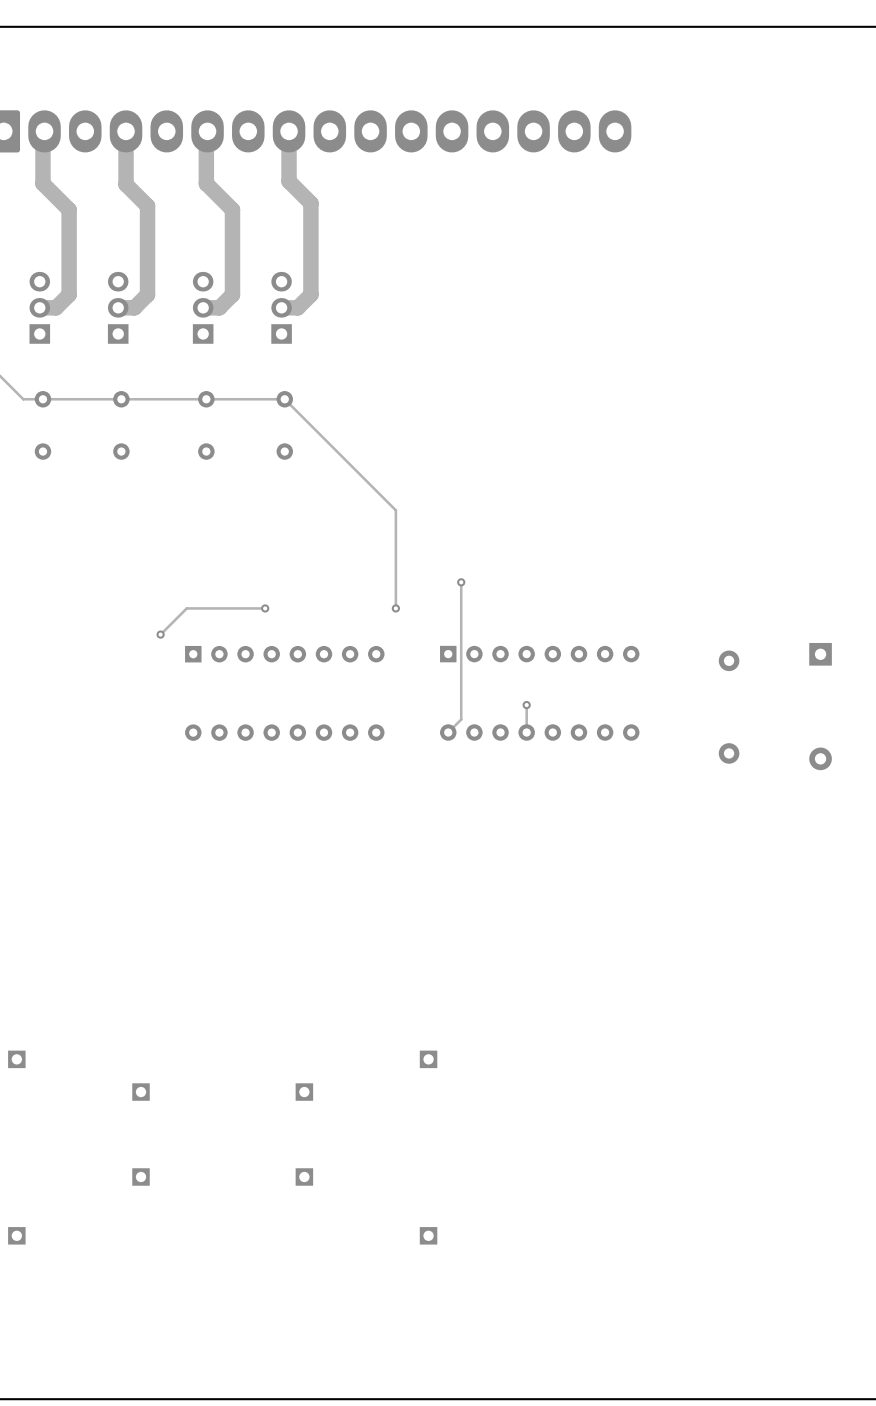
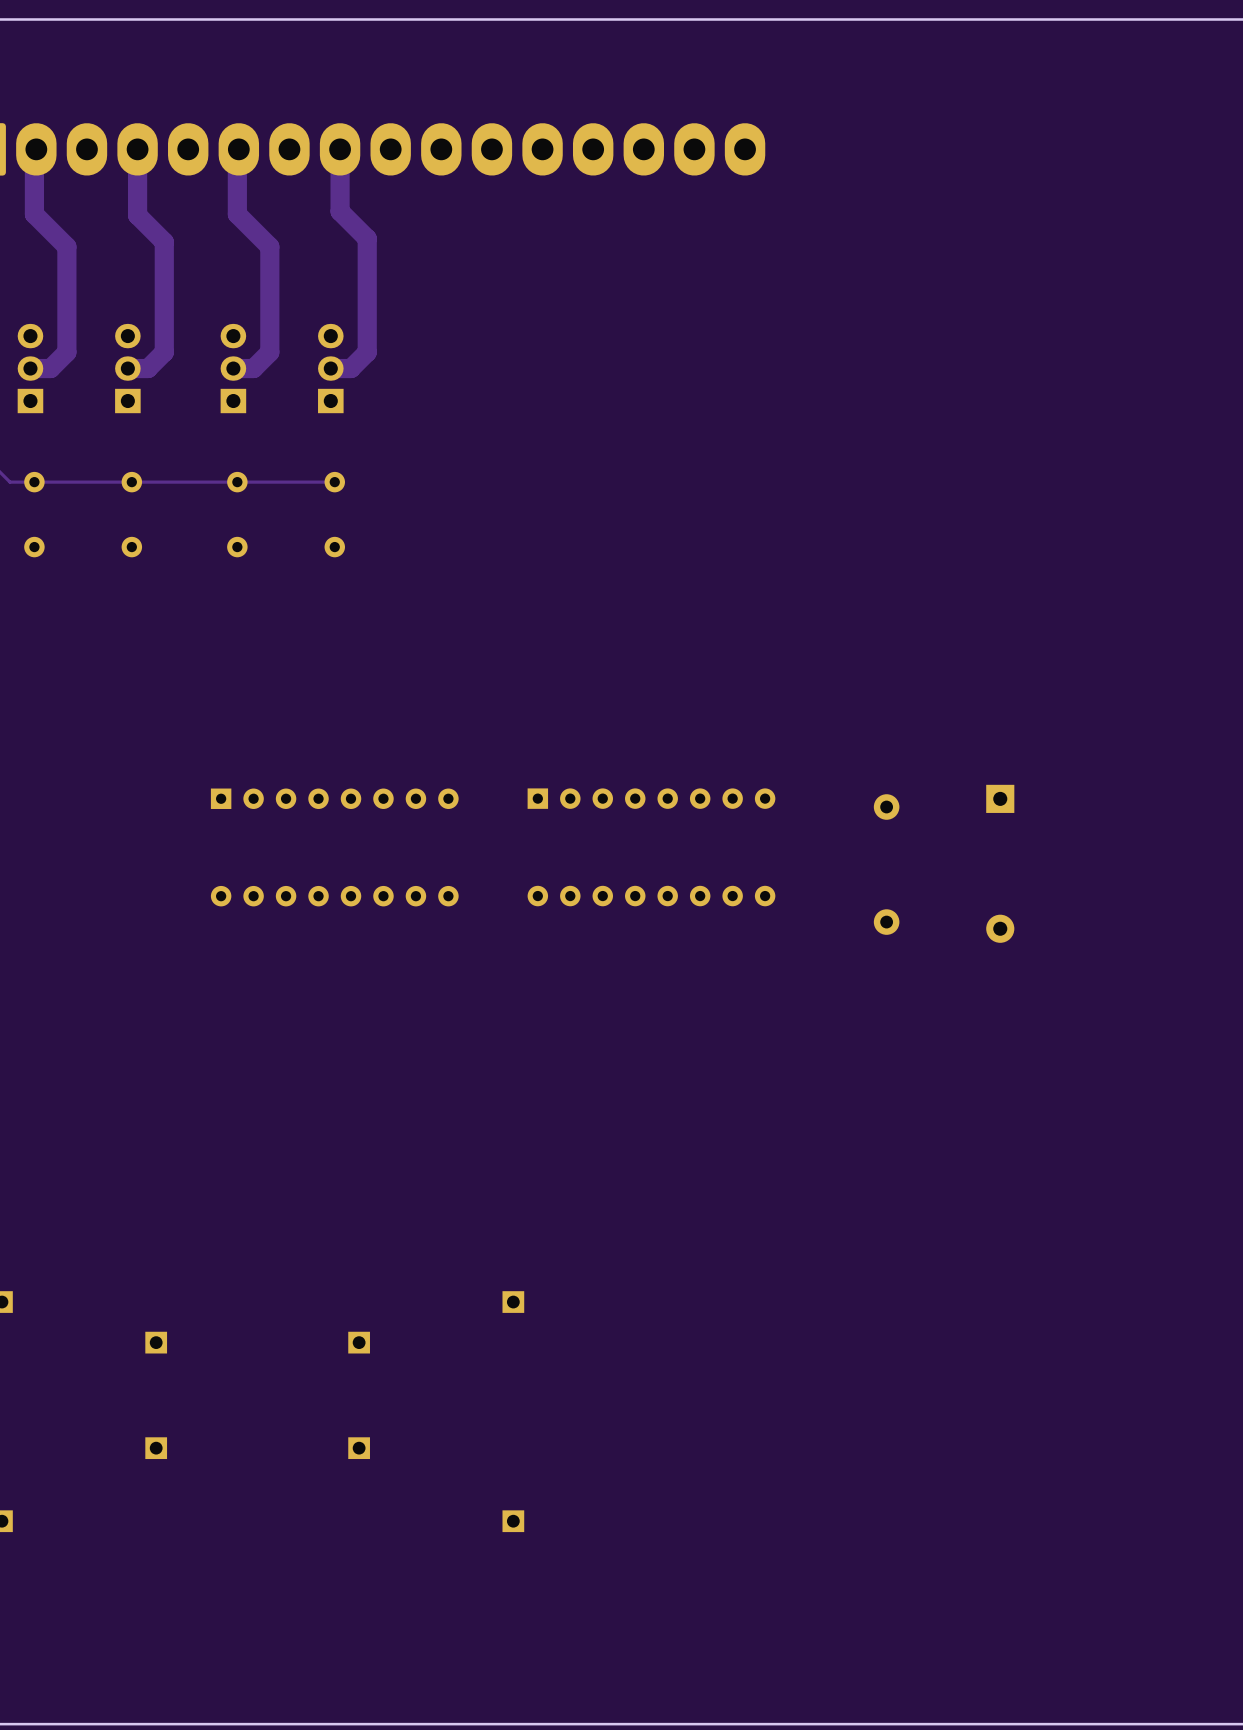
track: (284, 399) (395, 510) (395, 608) -> none
track: (461, 582) (461, 719) (448, 732) -> none
via: (461, 582) -> none
track: (265, 608) (186, 608) (160, 634) -> none
via: (265, 608) -> none
via: (395, 608) -> none
via: (160, 634) -> none
track: (526, 705) (526, 732) -> none
via: (526, 705) -> none

